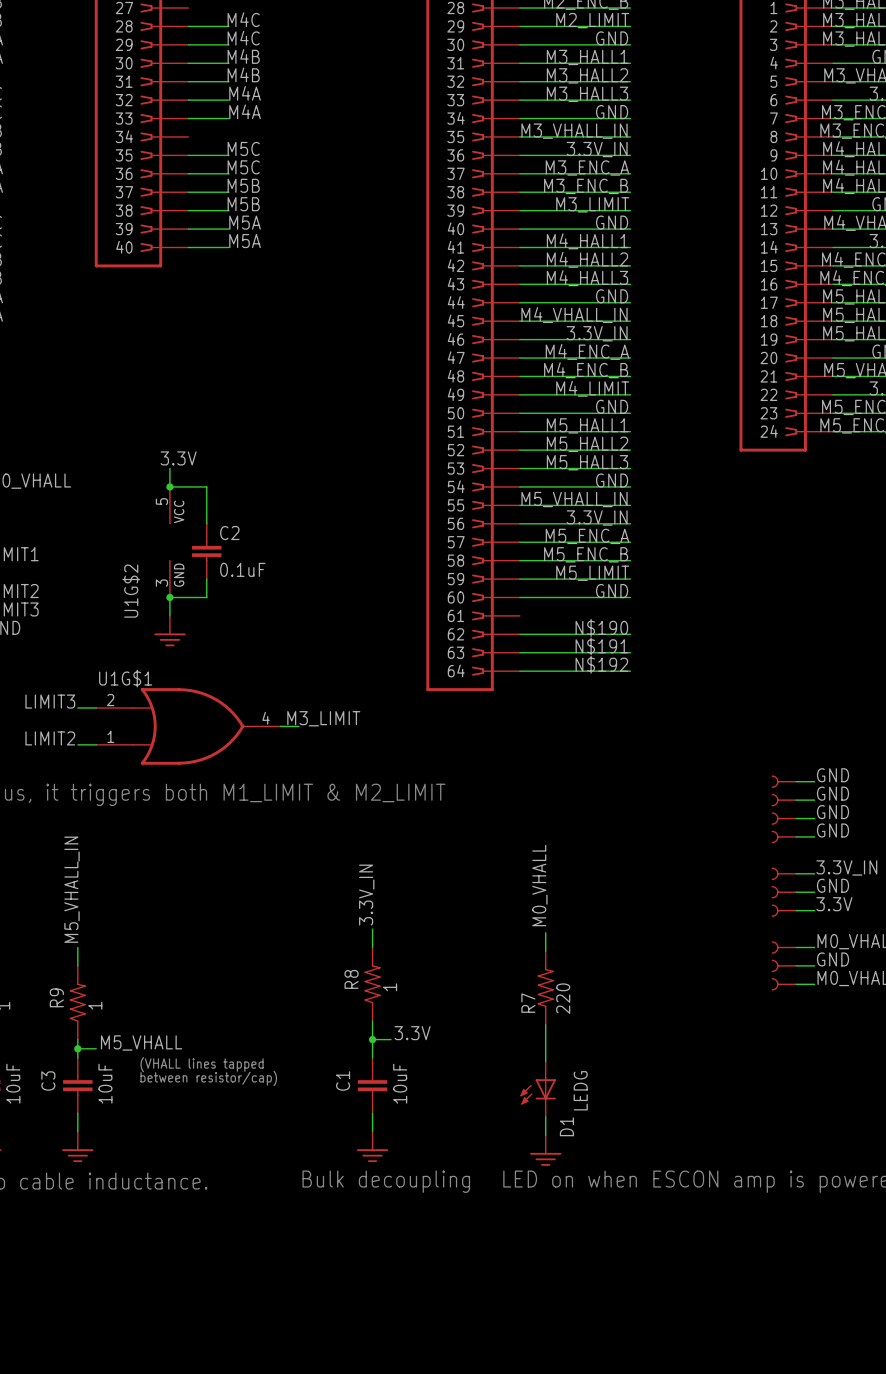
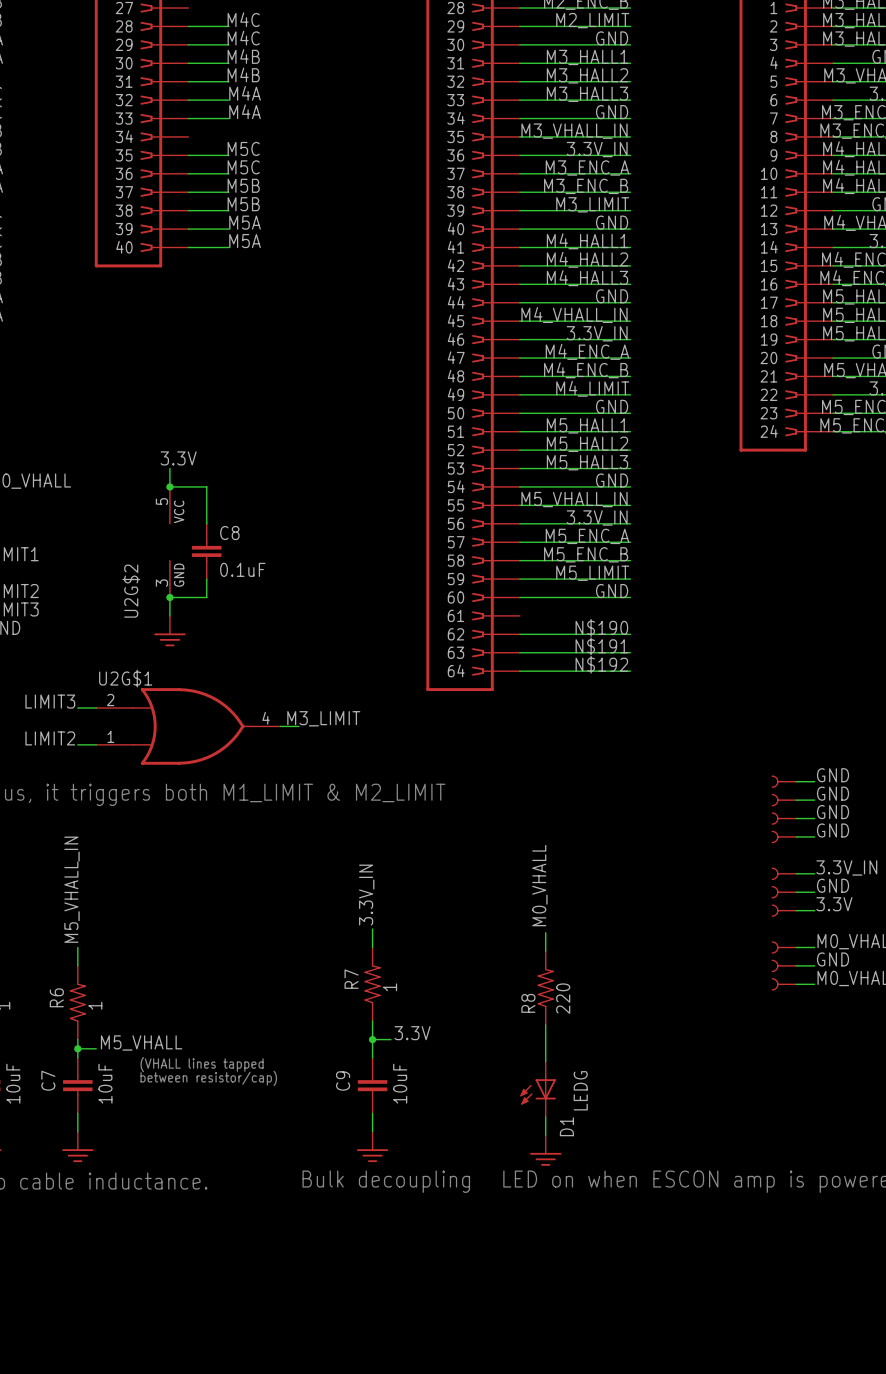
C2 name: C2 (229, 533) -> C8 (229, 533)
U1G$2 name: U1G$2 (131, 591) -> U2G$2 (131, 591)
U1G$1 name: U1G$1 (125, 678) -> U2G$1 (125, 678)
R8 name: R8 (351, 979) -> R7 (351, 979)
R9 name: R9 (56, 997) -> R6 (56, 997)
R7 name: R7 (528, 1003) -> R8 (528, 1003)
C3 name: C3 (48, 1081) -> C7 (48, 1080)
C1 name: C1 (343, 1081) -> C9 (343, 1081)

